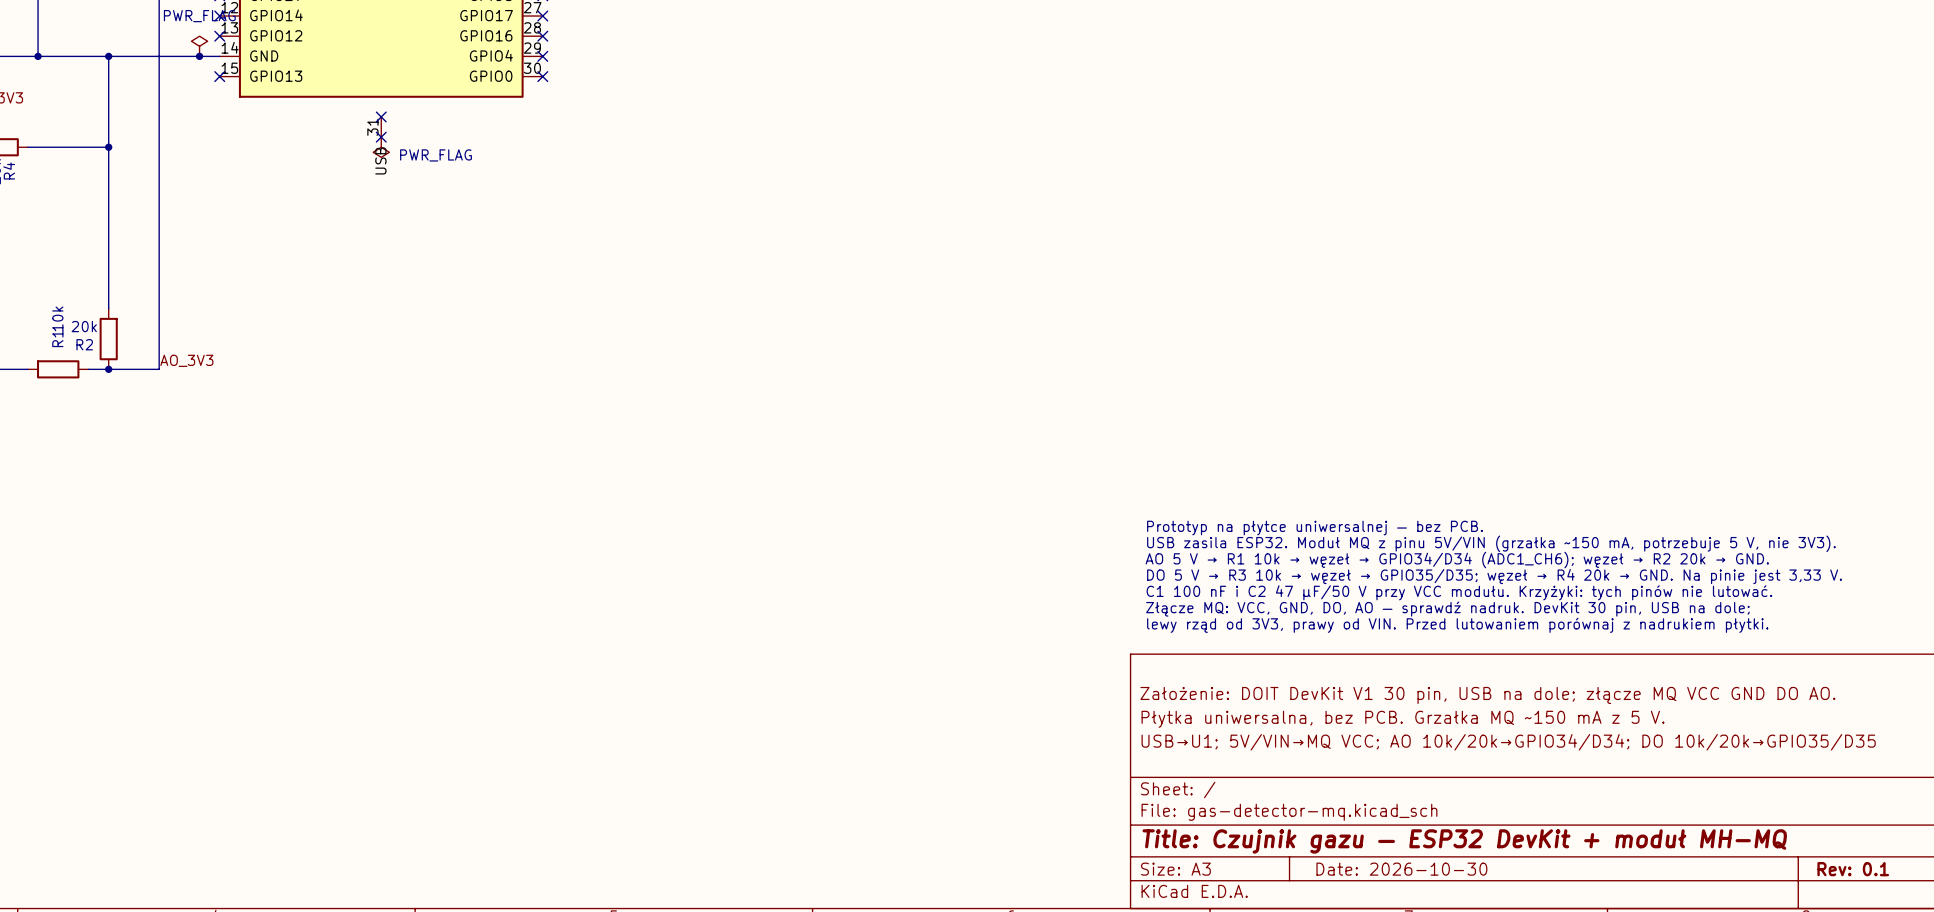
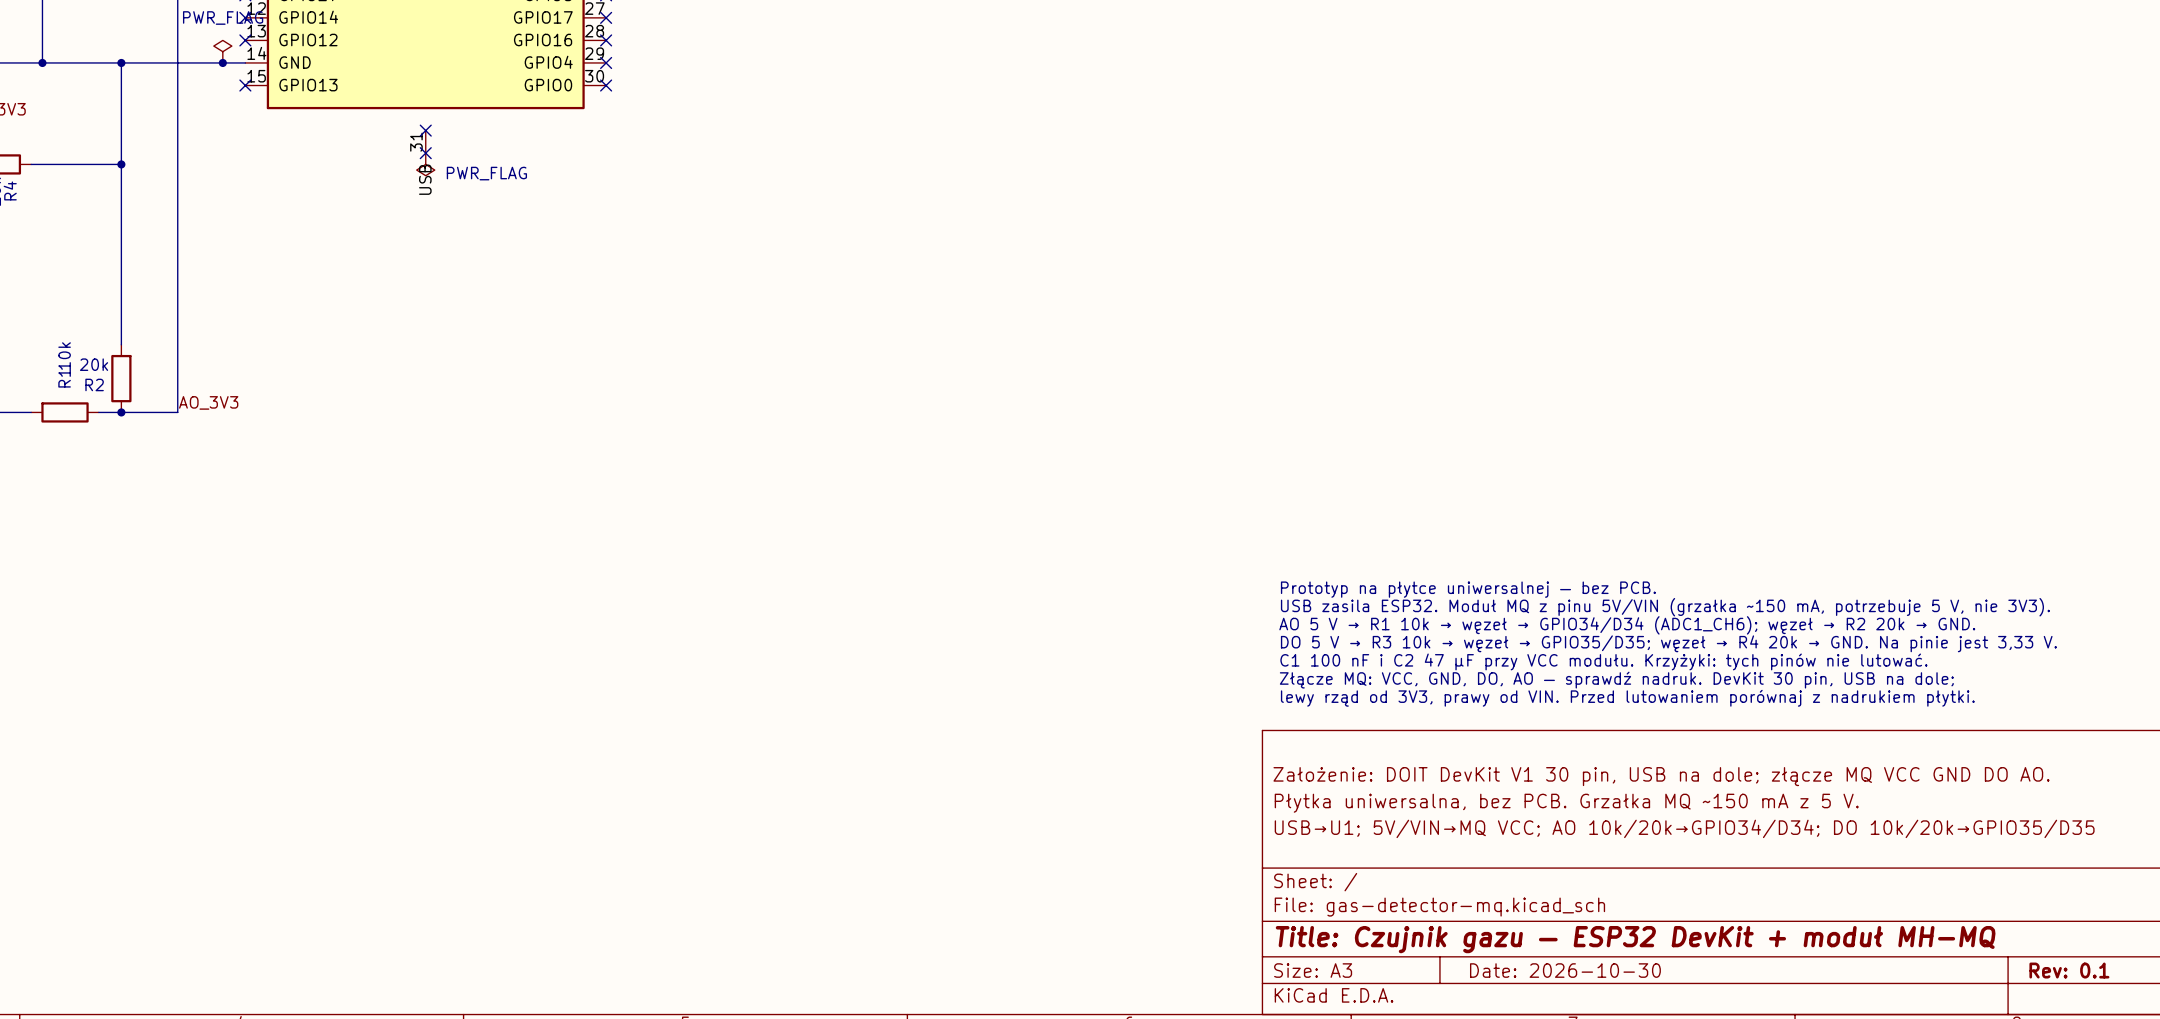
text: C1 100 nF i C2 47 µF/50 V przy VCC modułu. Krzyżyki: tych pinów nie lutować. (1459, 592) -> C1 100 nF i C2 47 µF przy VCC modułu. Krzyżyki: tych pinów nie lutować. (1603, 661)

